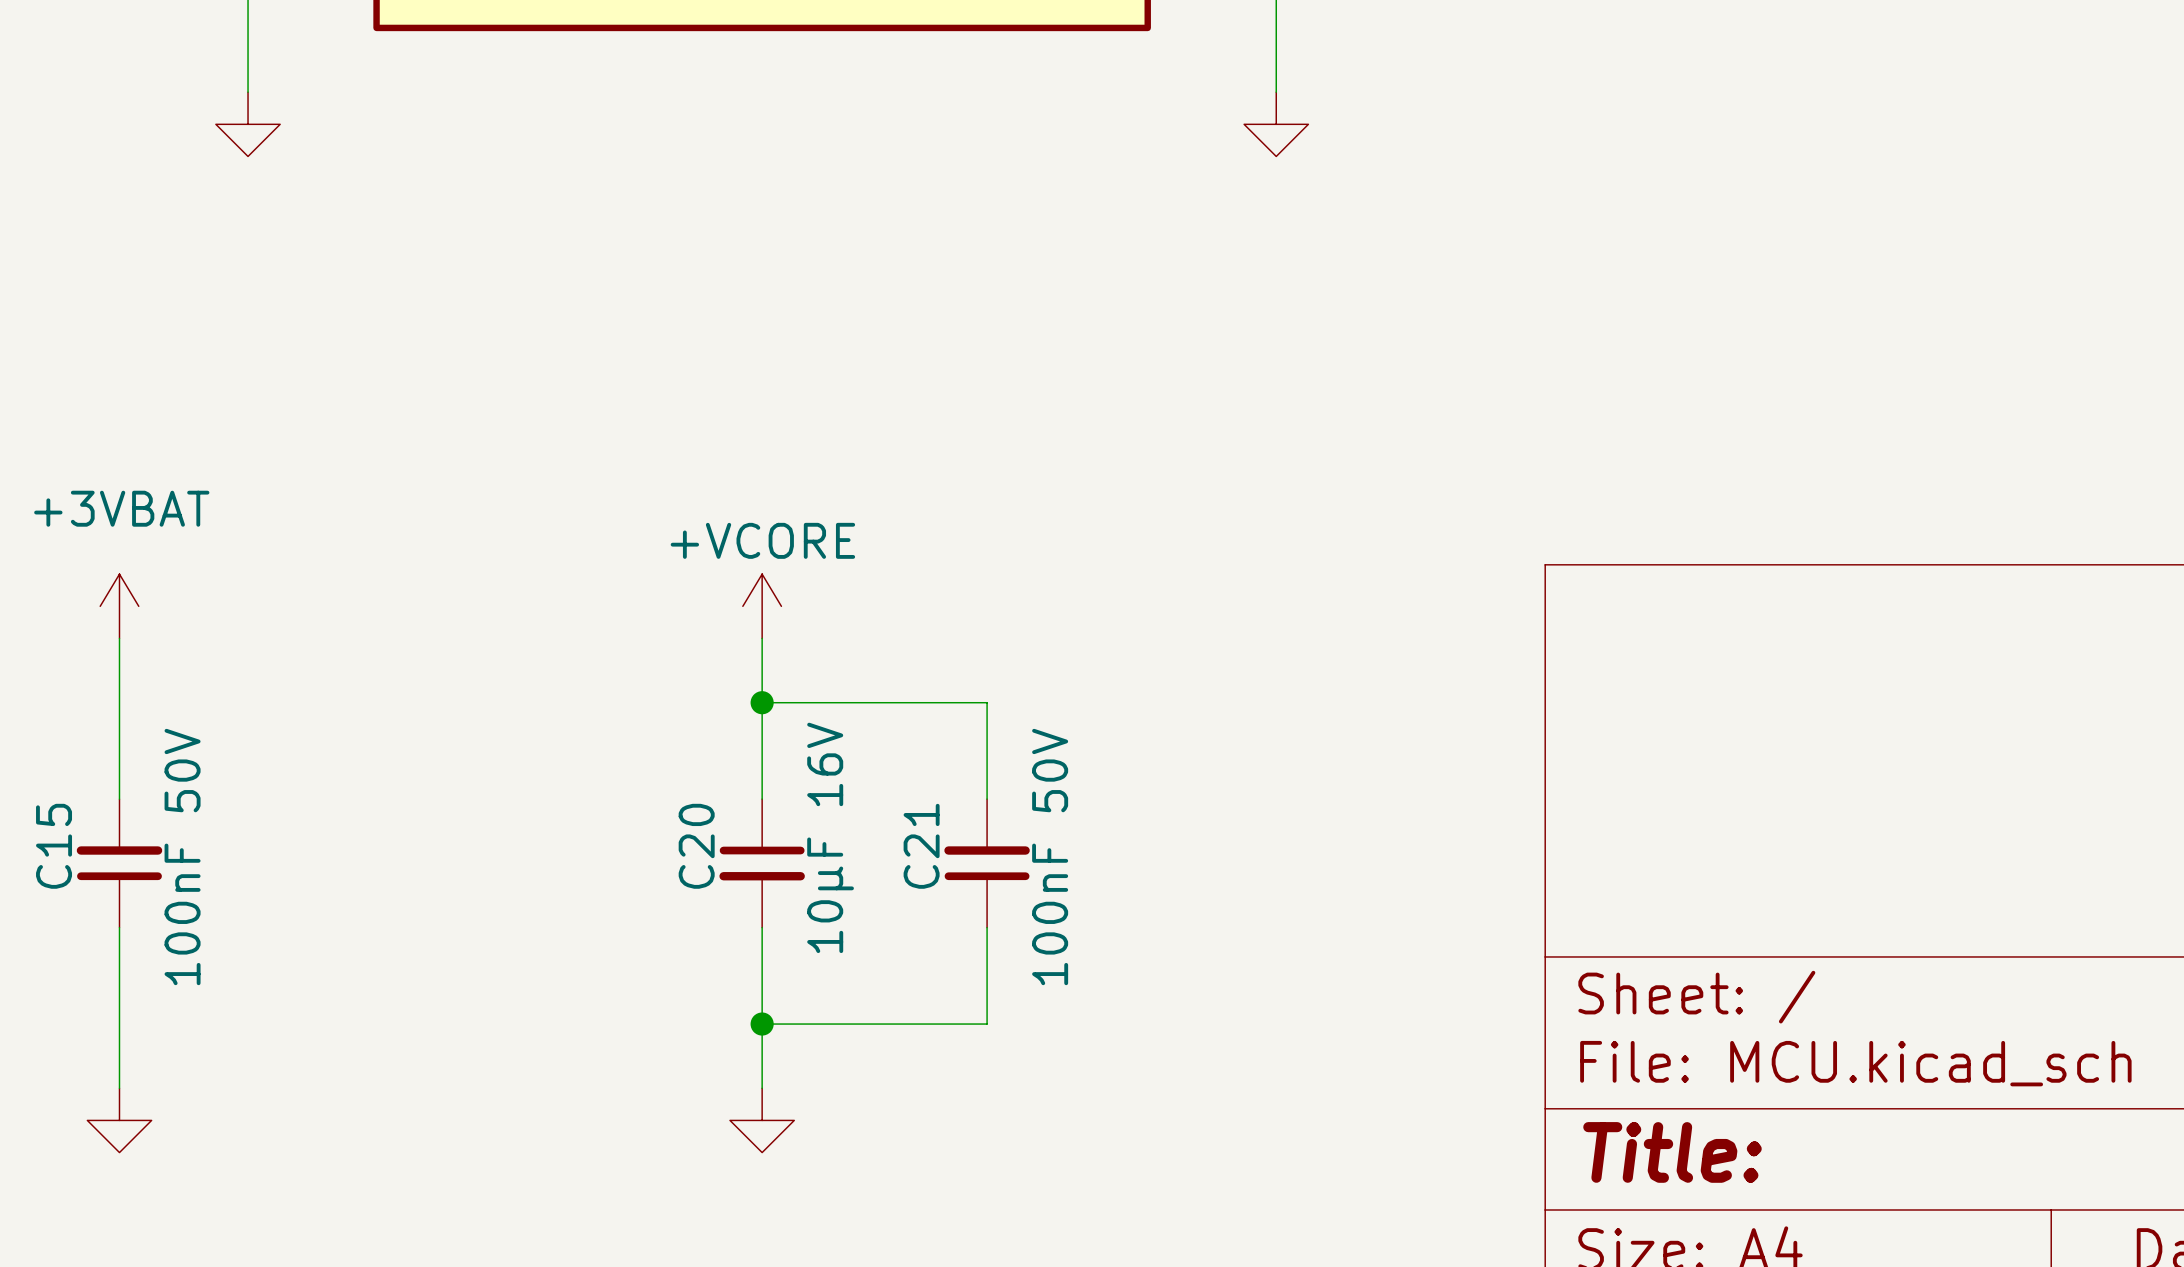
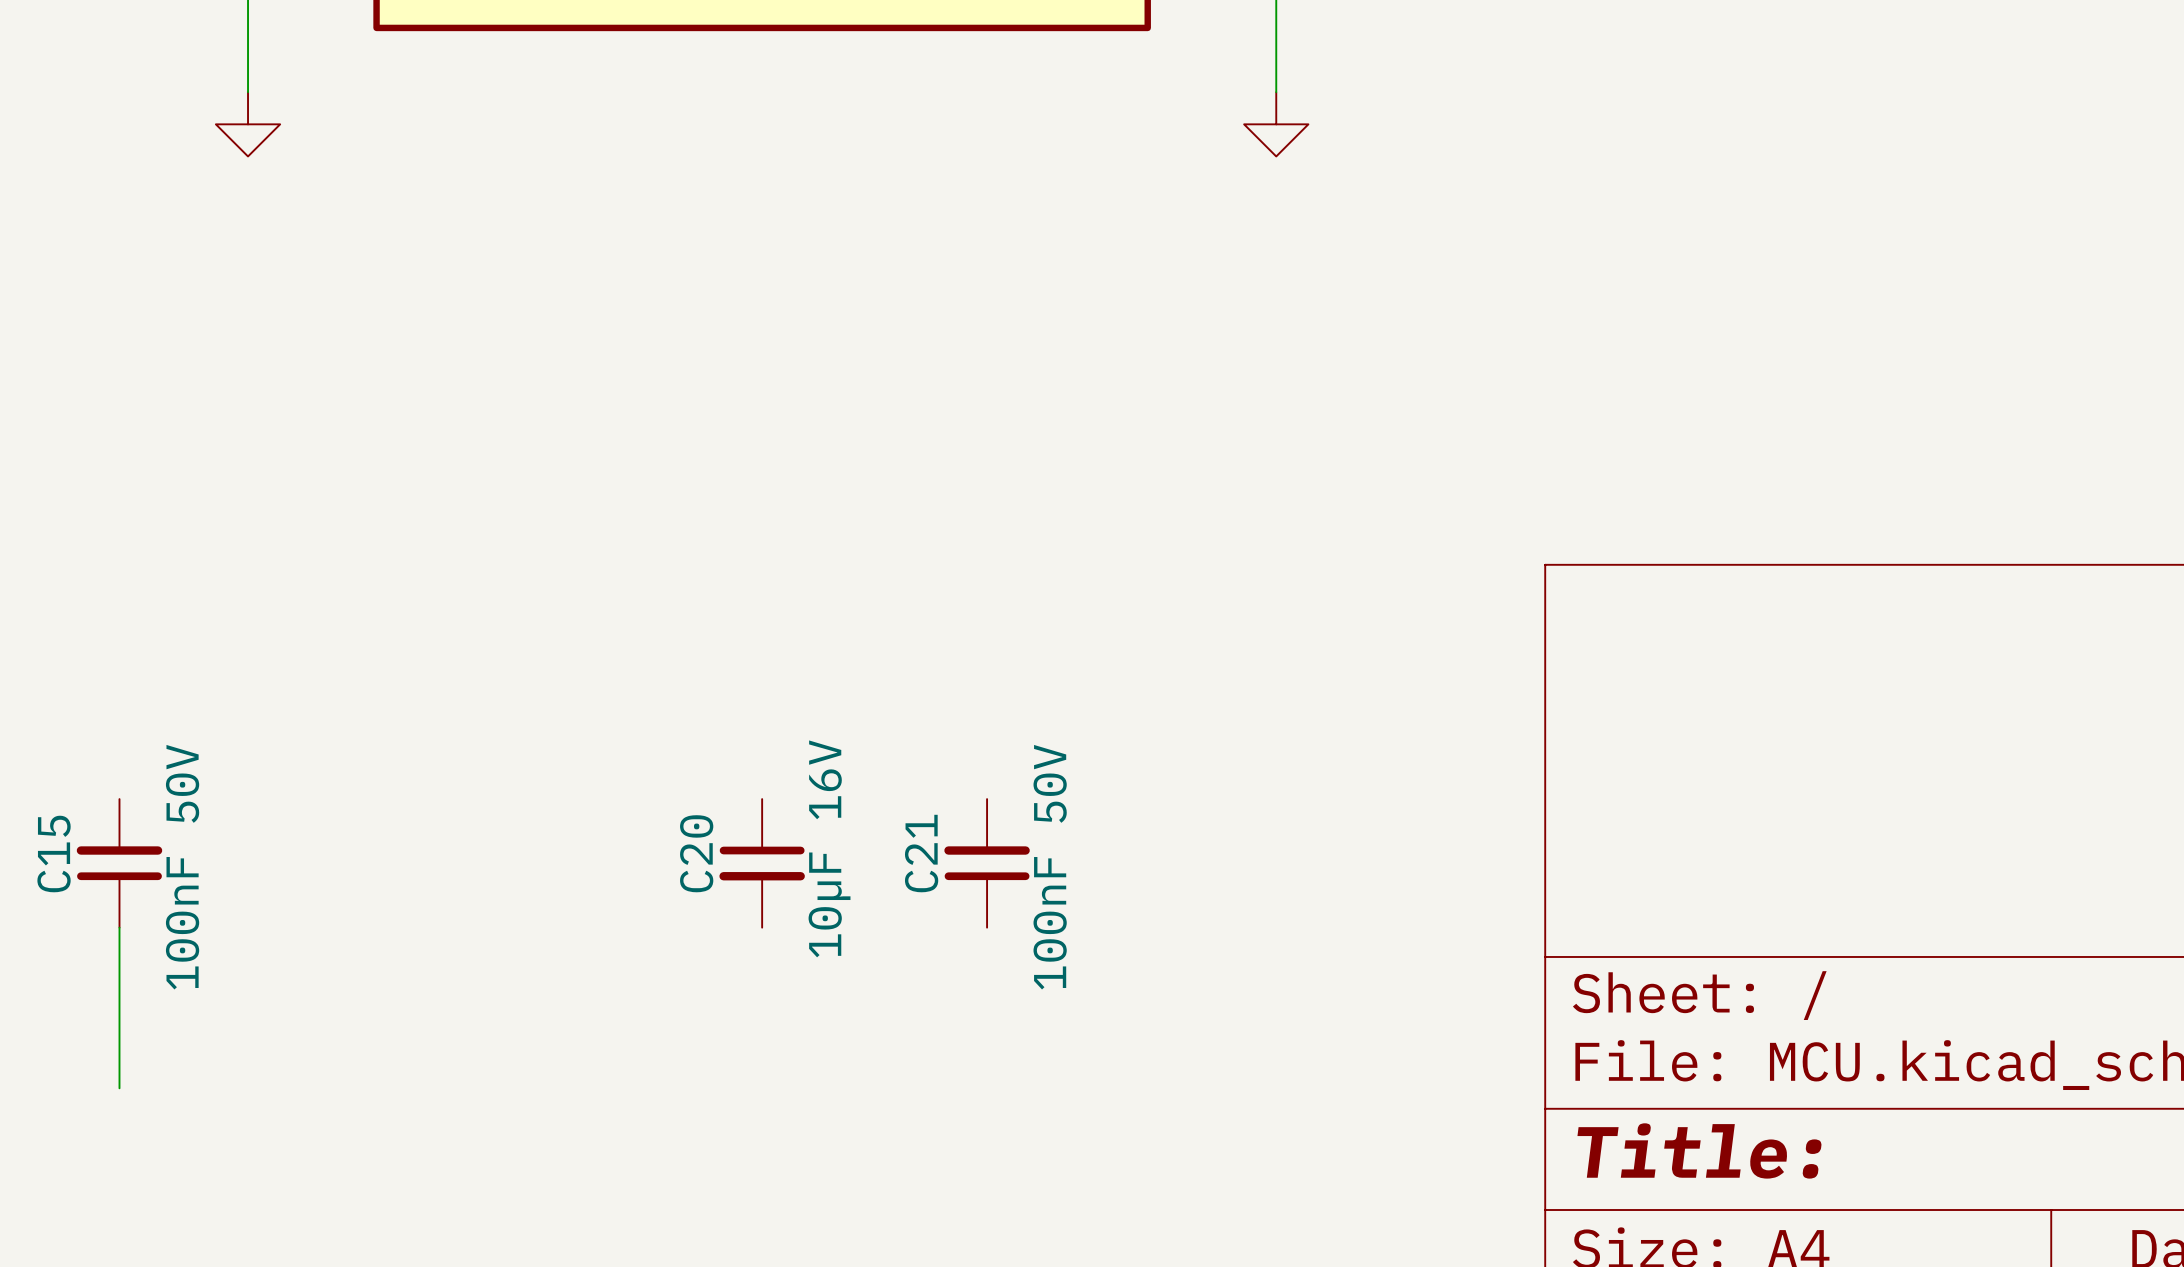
power symbol: +3VBAT (119, 606) -> none
power symbol: +VCORE (762, 606) -> none
wire: (119, 638) (119, 799) -> none
wire: (762, 638) (762, 799) -> none
wire: (762, 702) (987, 702) (987, 799) -> none
junction: (762, 702) -> none
wire: (762, 927) (762, 1088) -> none
wire: (987, 927) (987, 1024) (762, 1024) -> none
junction: (762, 1024) -> none
power symbol: (119, 1120) -> none
power symbol: (762, 1120) -> none

